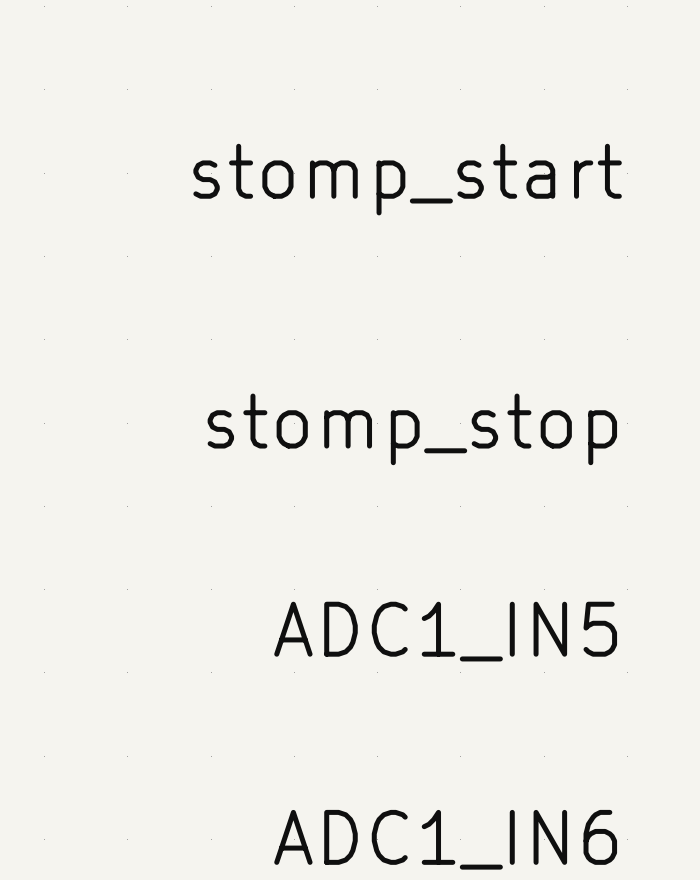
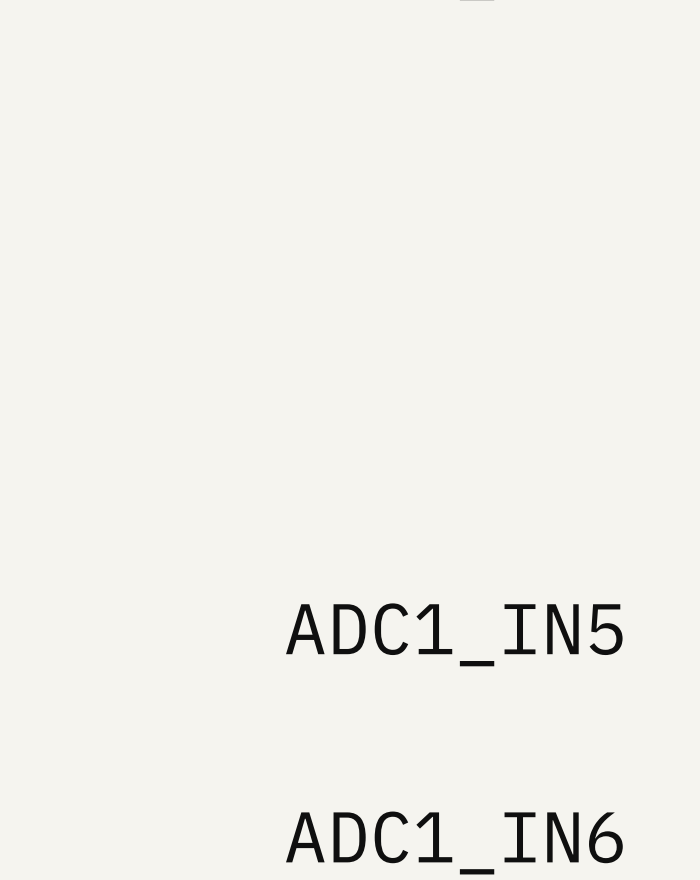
label: stomp_start (407, 179) -> none
label: stomp_stop (412, 429) -> none

